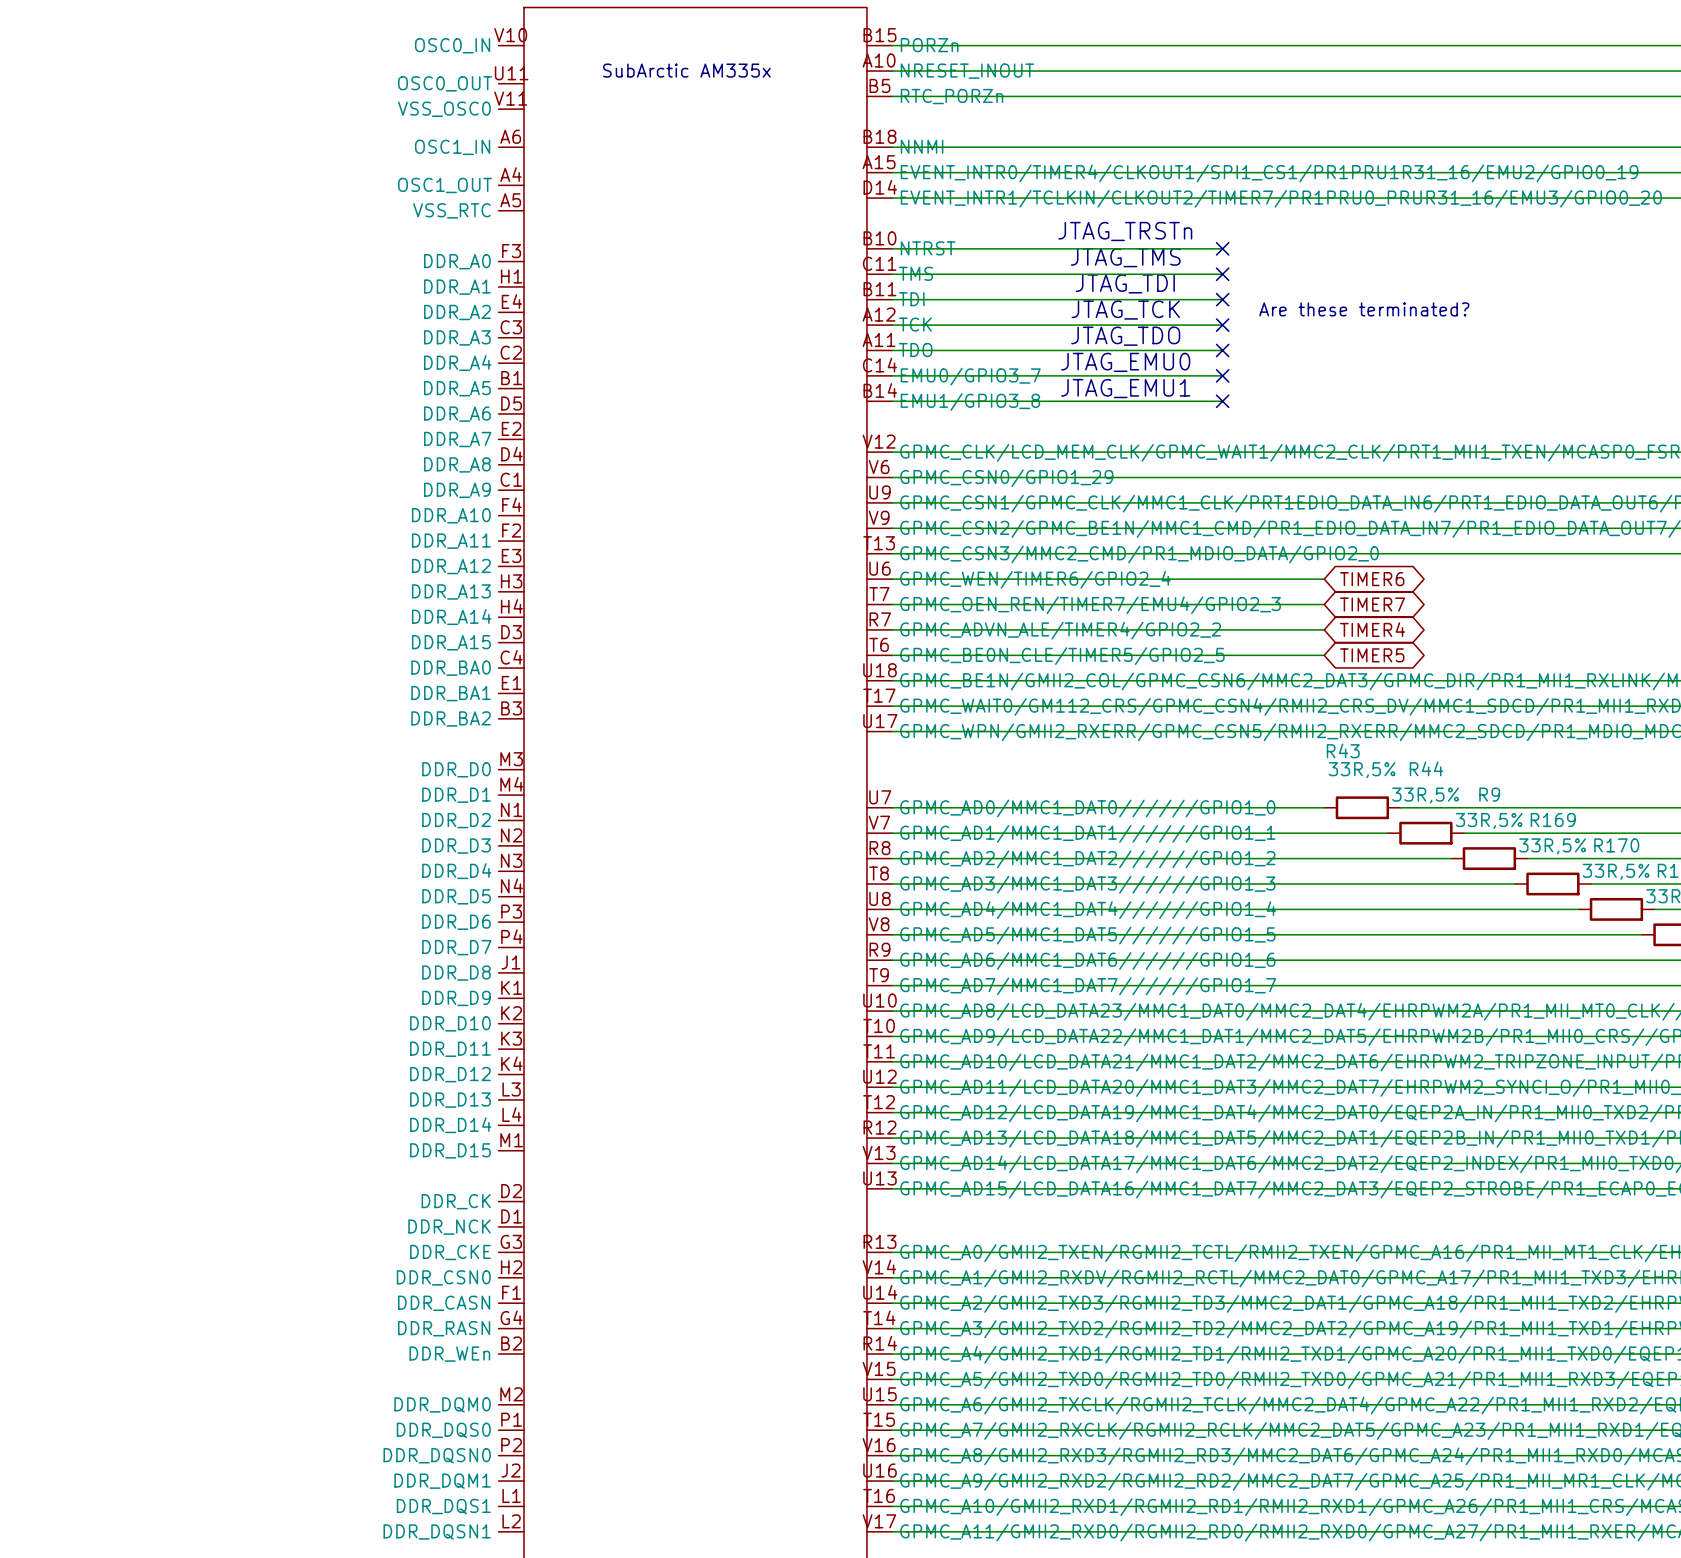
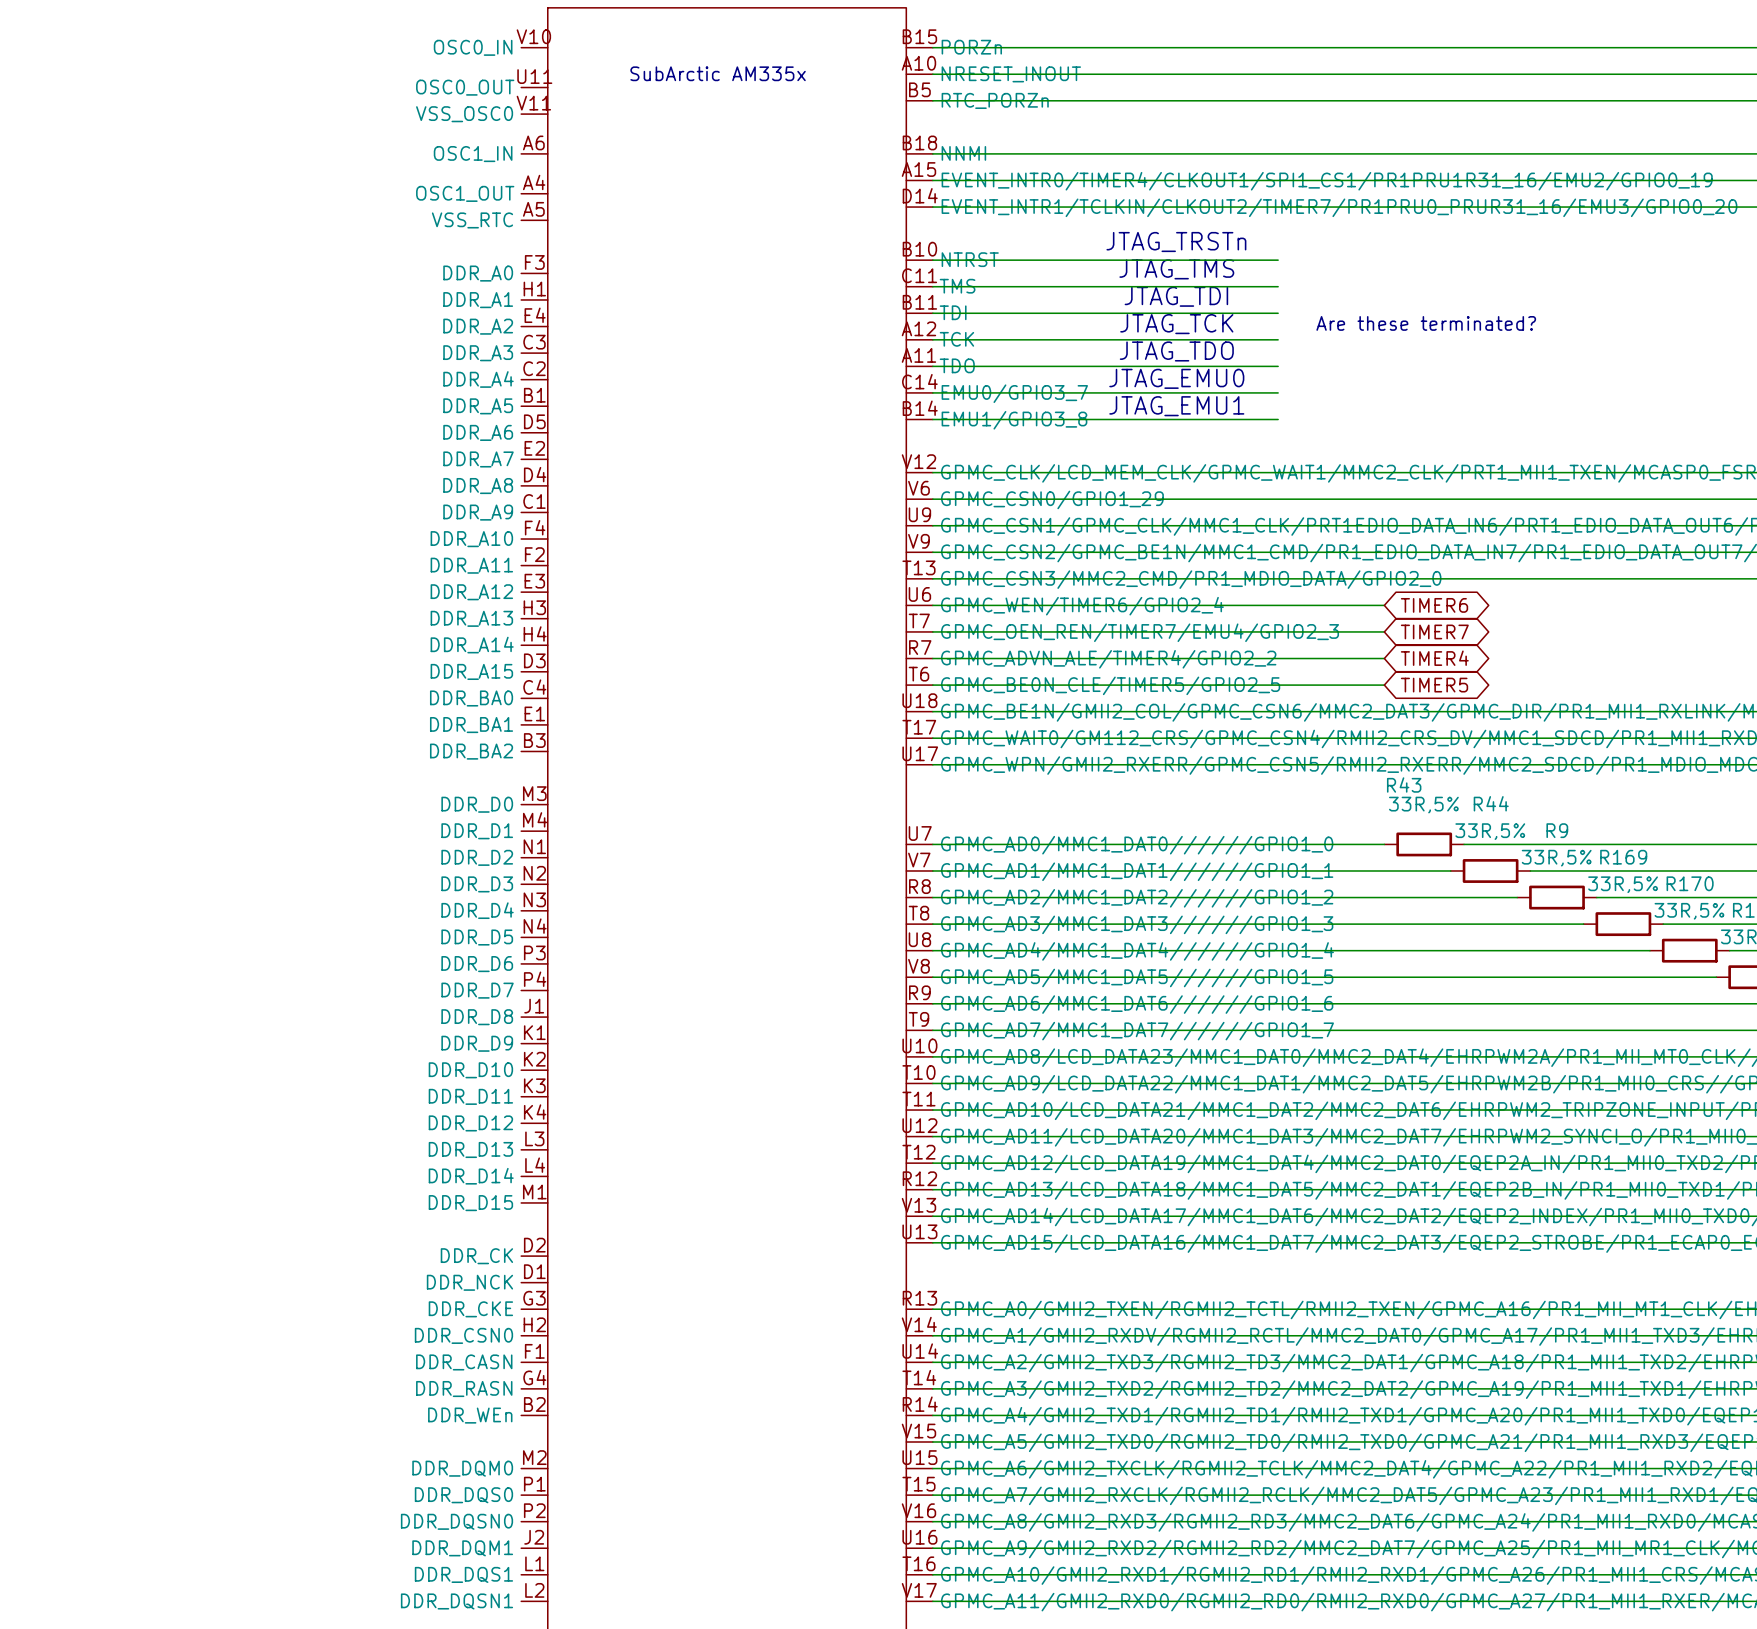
no-connect mark: (1222, 248) -> none
no-connect mark: (1222, 274) -> none
no-connect mark: (1222, 299) -> none
no-connect mark: (1222, 325) -> none
no-connect mark: (1222, 350) -> none
no-connect mark: (1222, 375) -> none
no-connect mark: (1222, 401) -> none

